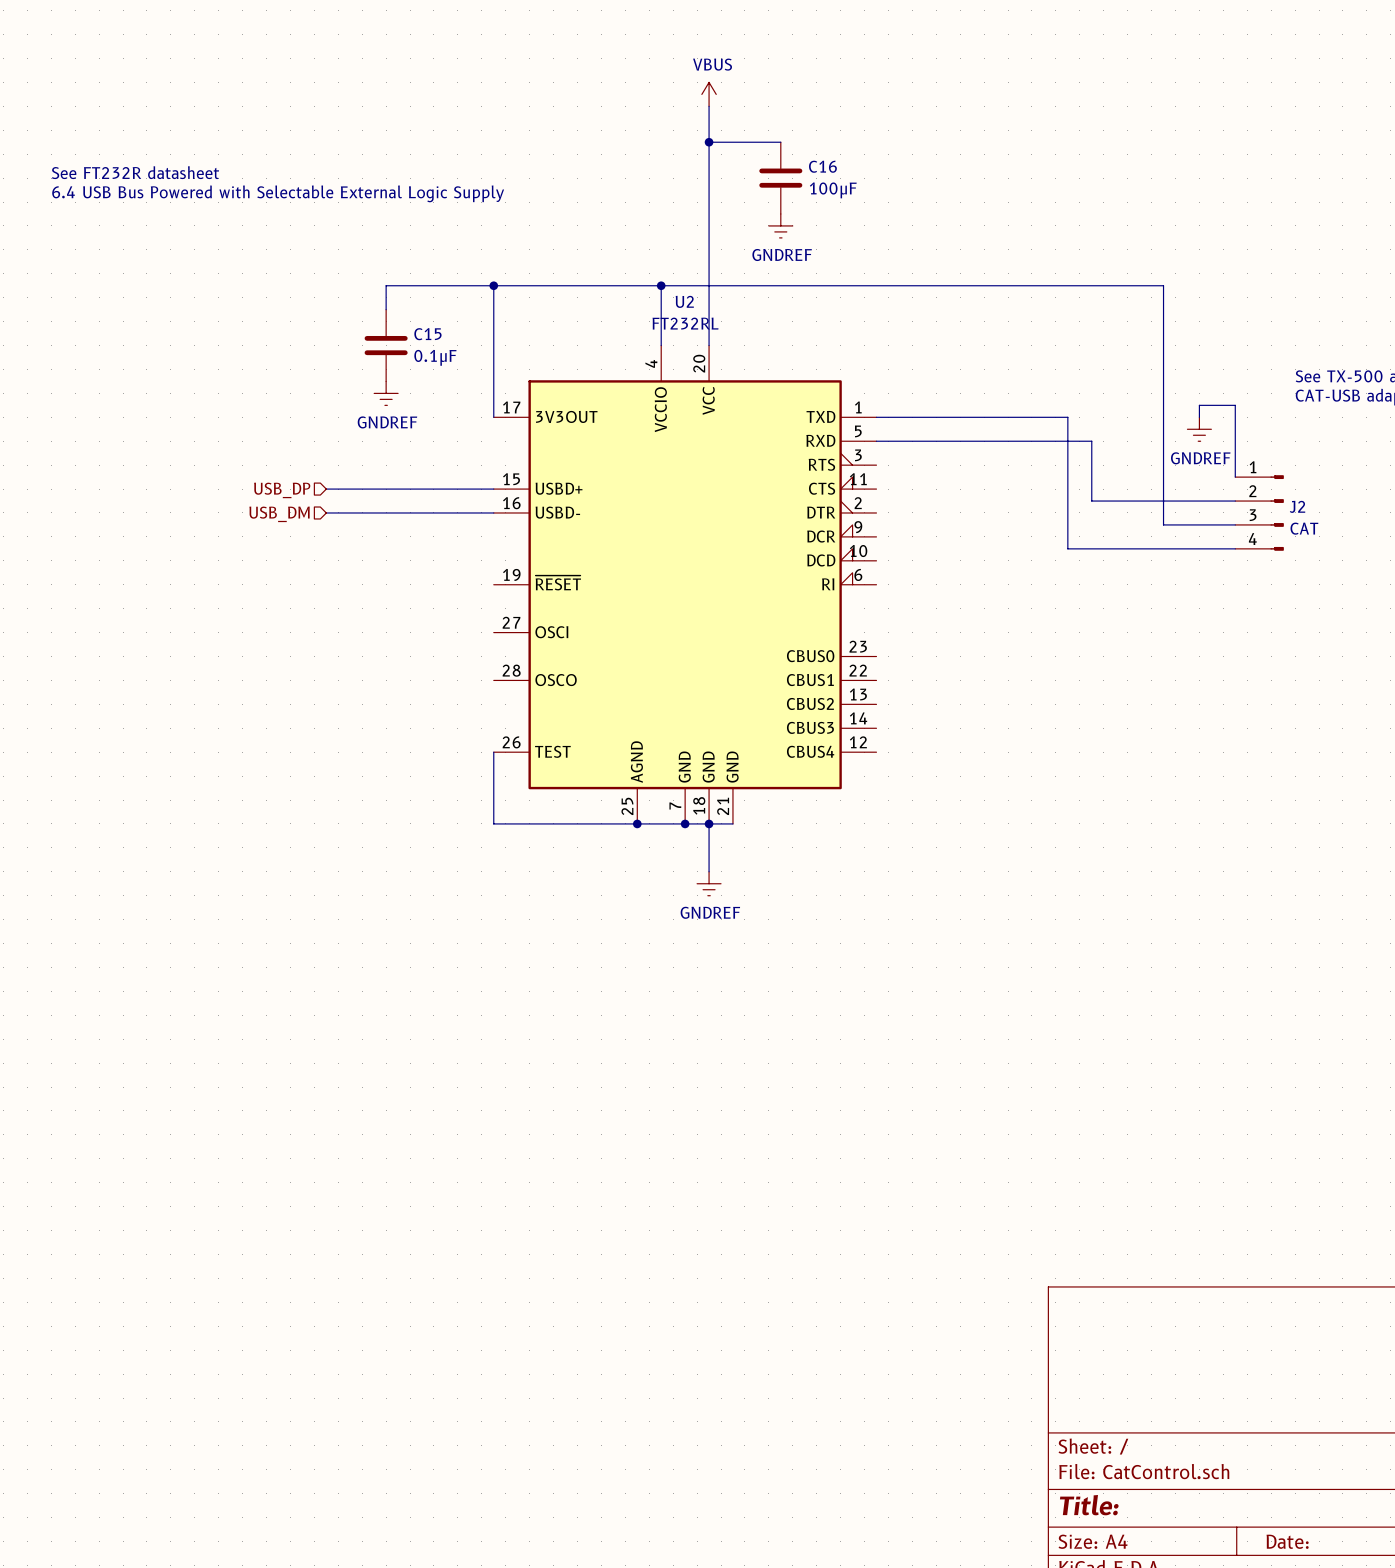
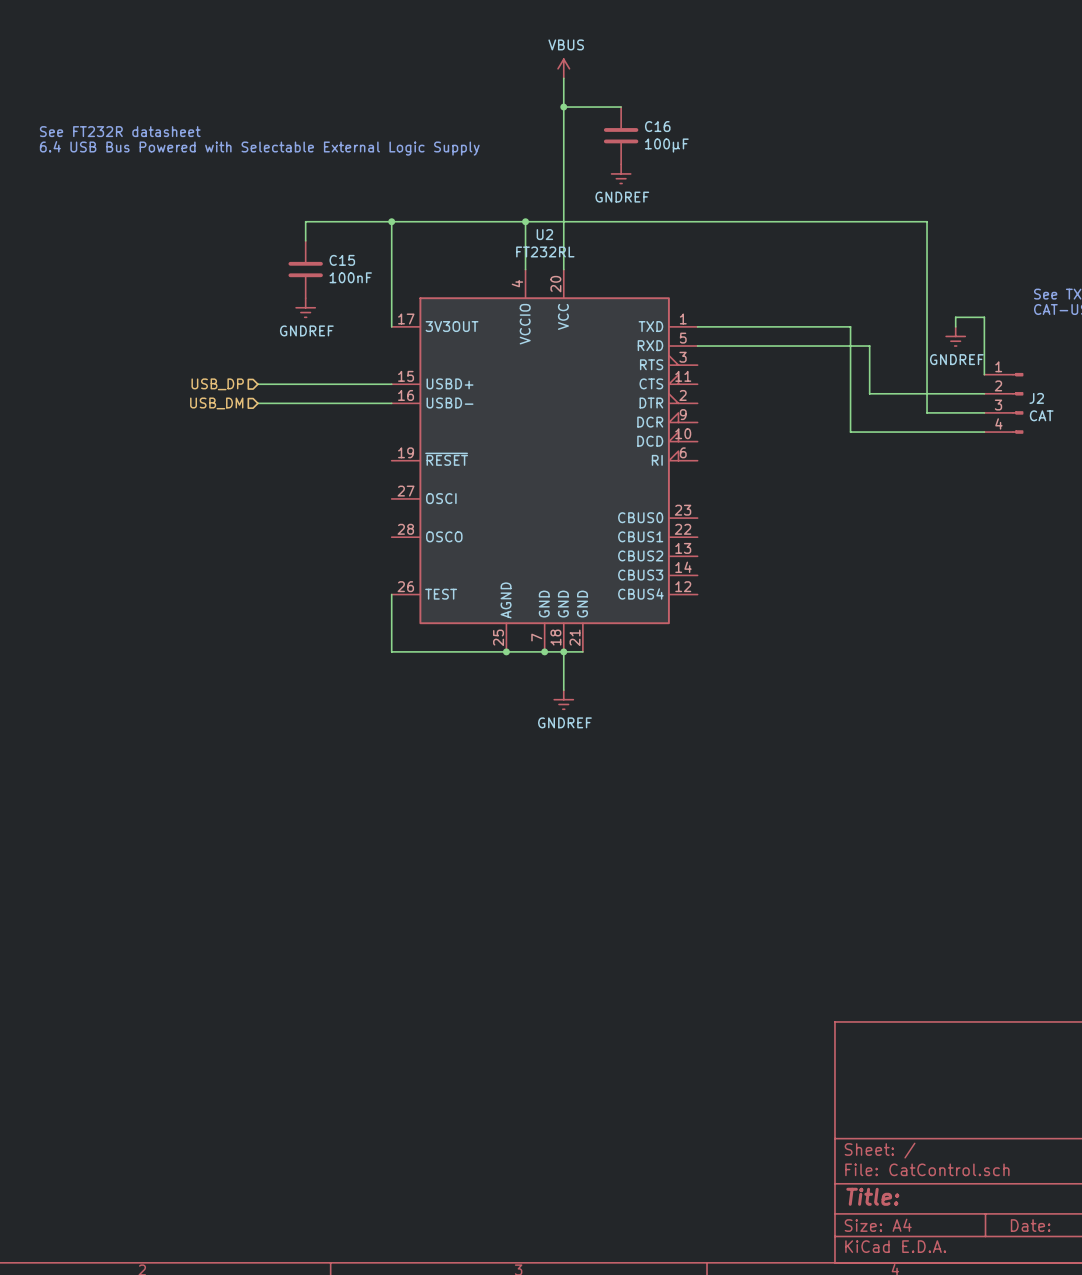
C15 value: 0.1μF (435, 357) -> 100nF (350, 277)

